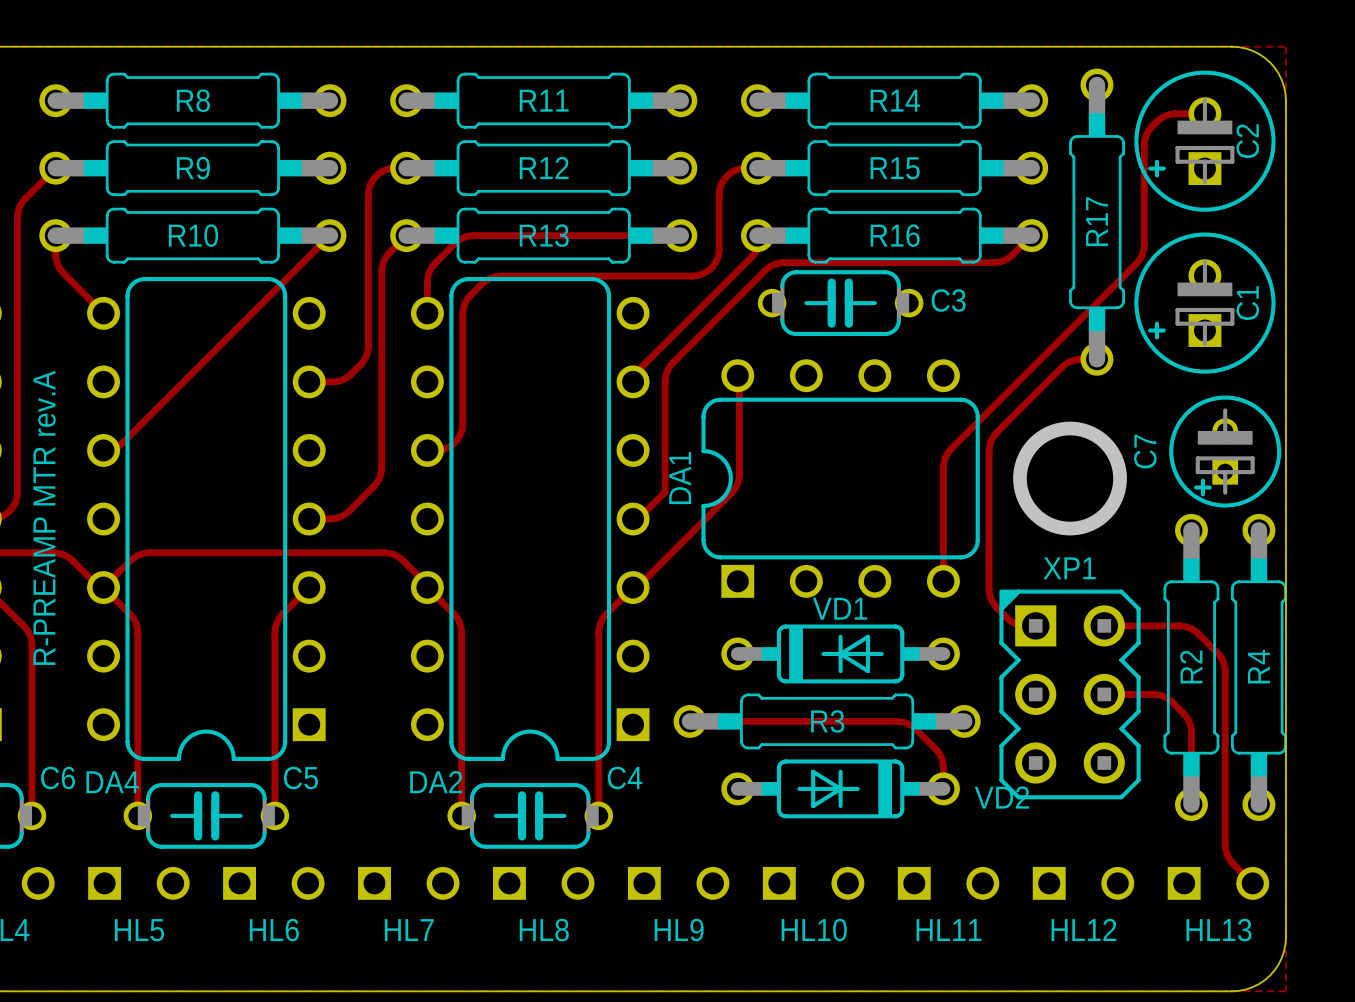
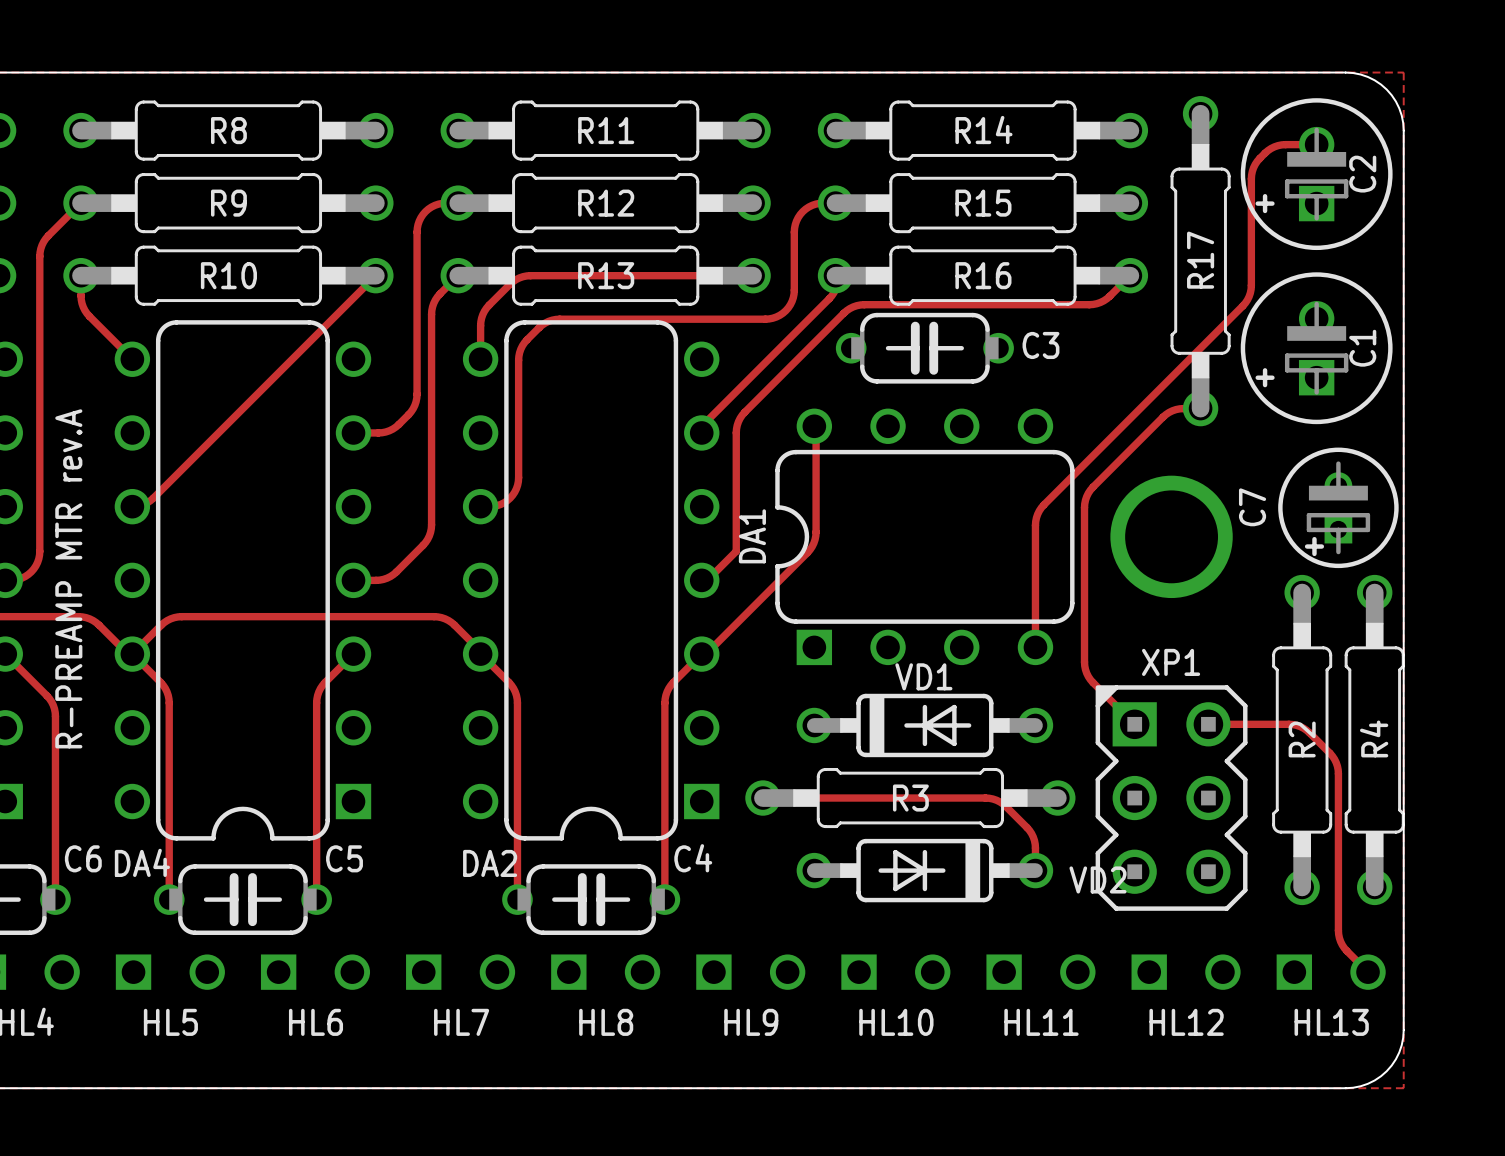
track: (989, 588) (992, 602) (1009, 620) (1019, 624) (1035, 625) -> (1084, 655) (1085, 669) (1090, 679) (1134, 724)
track: (1104, 625) (1179, 625) (1192, 629) (1217, 652) (1223, 661) (1225, 698) -> (1208, 724) (1288, 724) (1300, 726) (1309, 732) (1332, 756) (1338, 773)
XP1 position: (1070, 694) -> (1171, 798)
track: (1104, 694) (1160, 695) (1169, 700) (1185, 716) (1191, 732) (1191, 804) -> none

